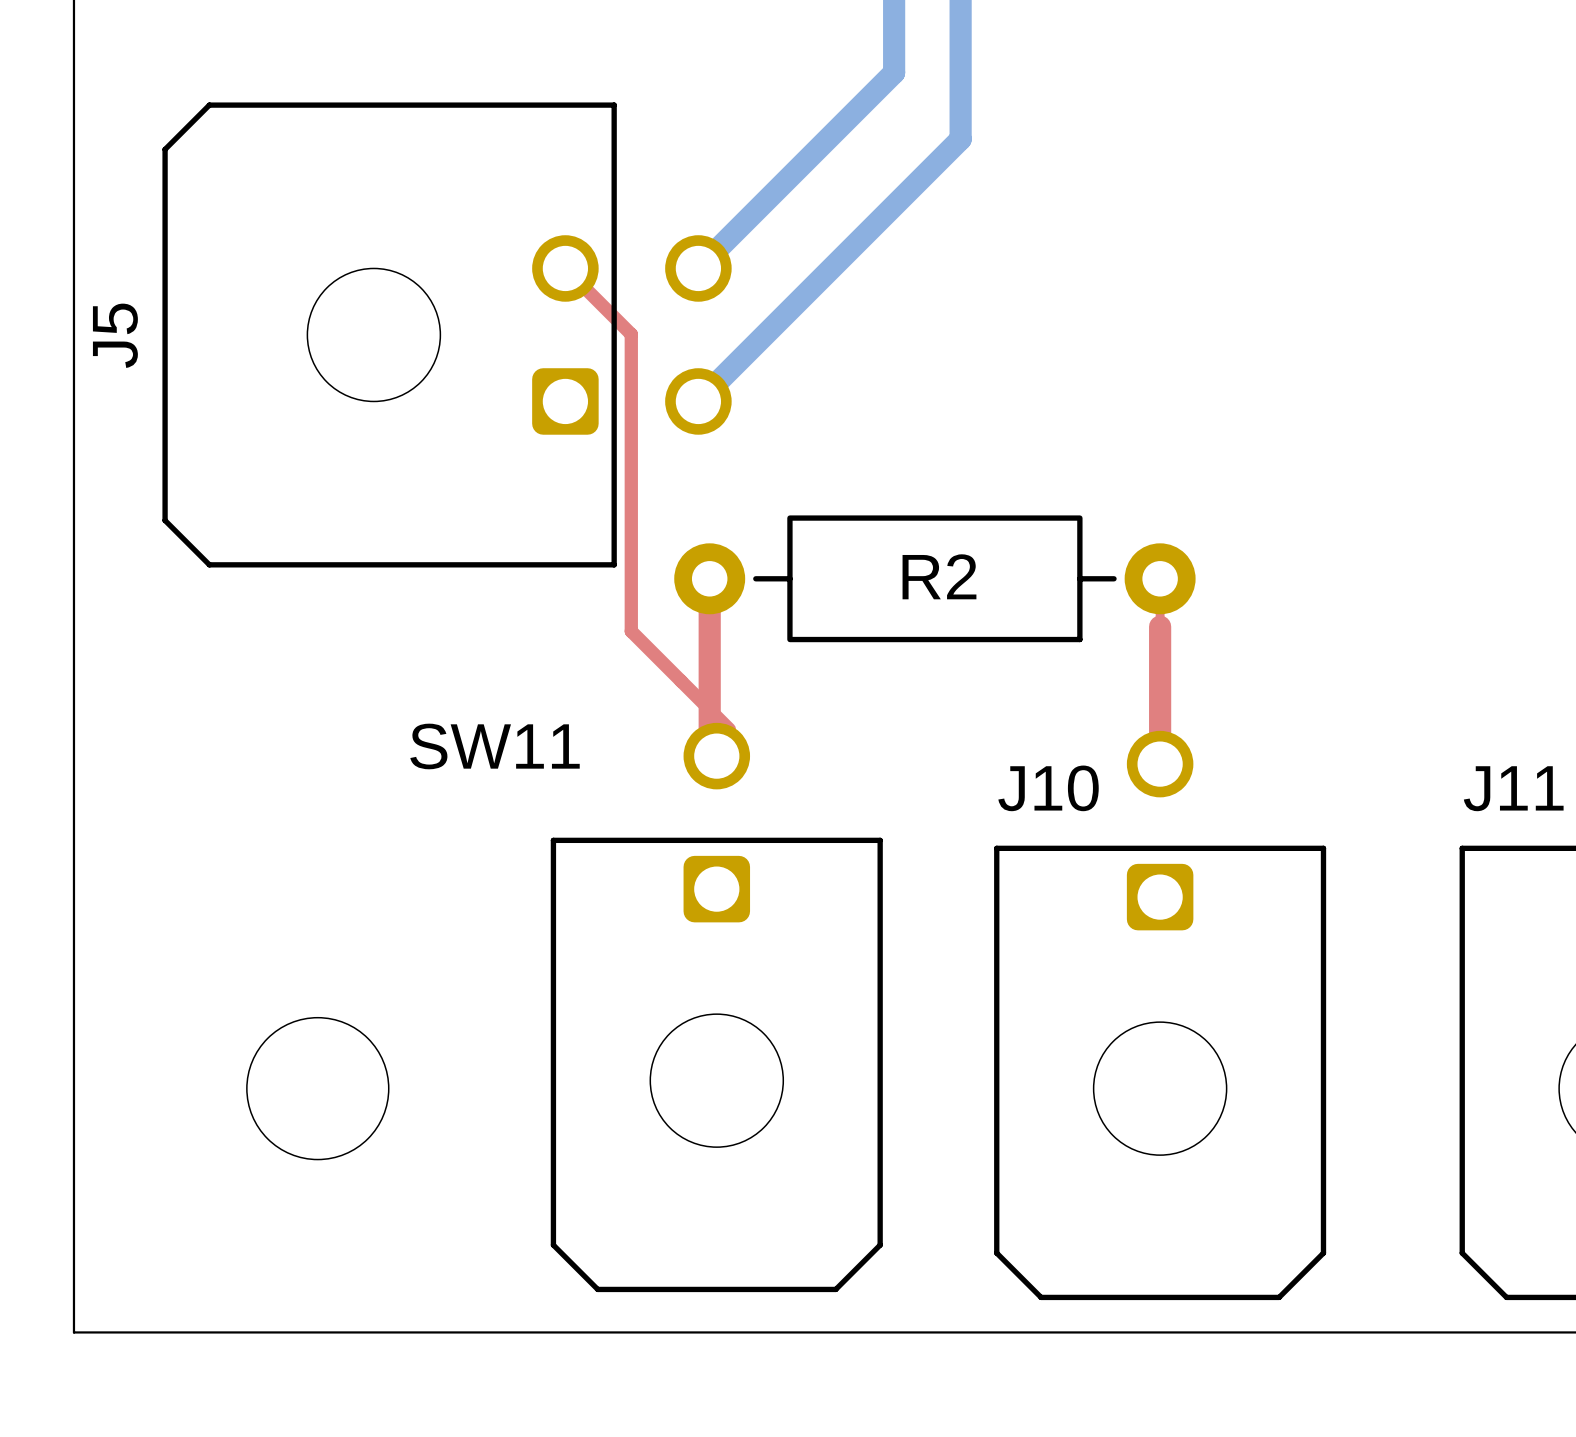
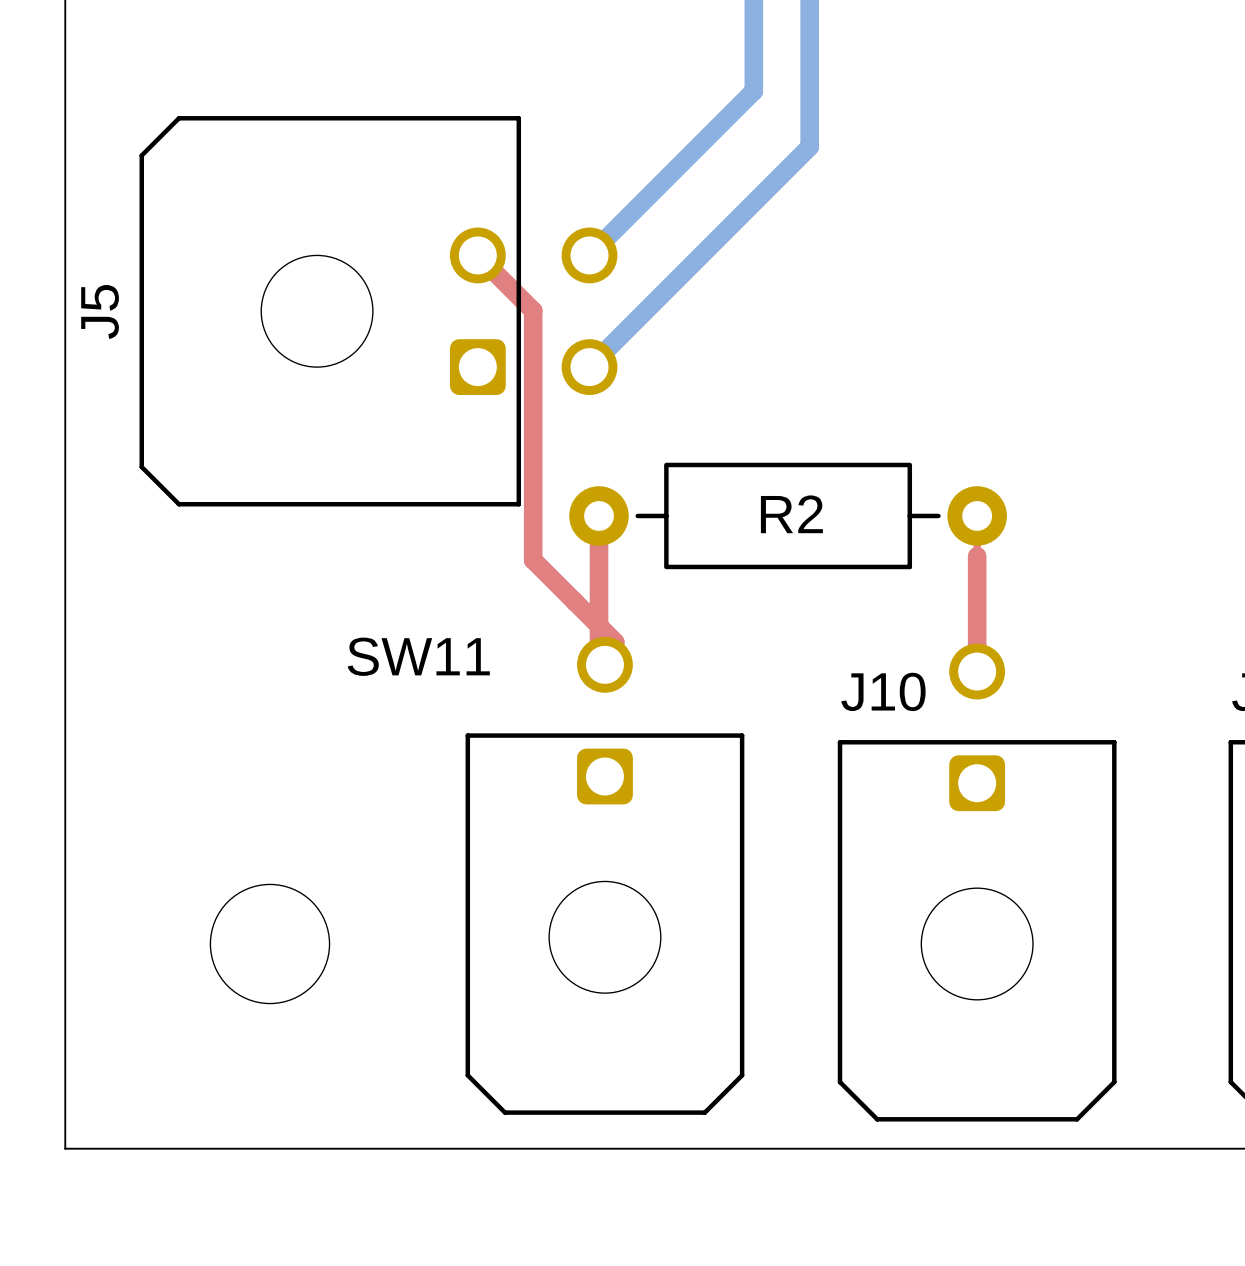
top track width: thin (565, 268) (631, 334) (631, 631) (729, 729) -> thick (477, 255) (533, 310) (533, 560) (615, 642)

